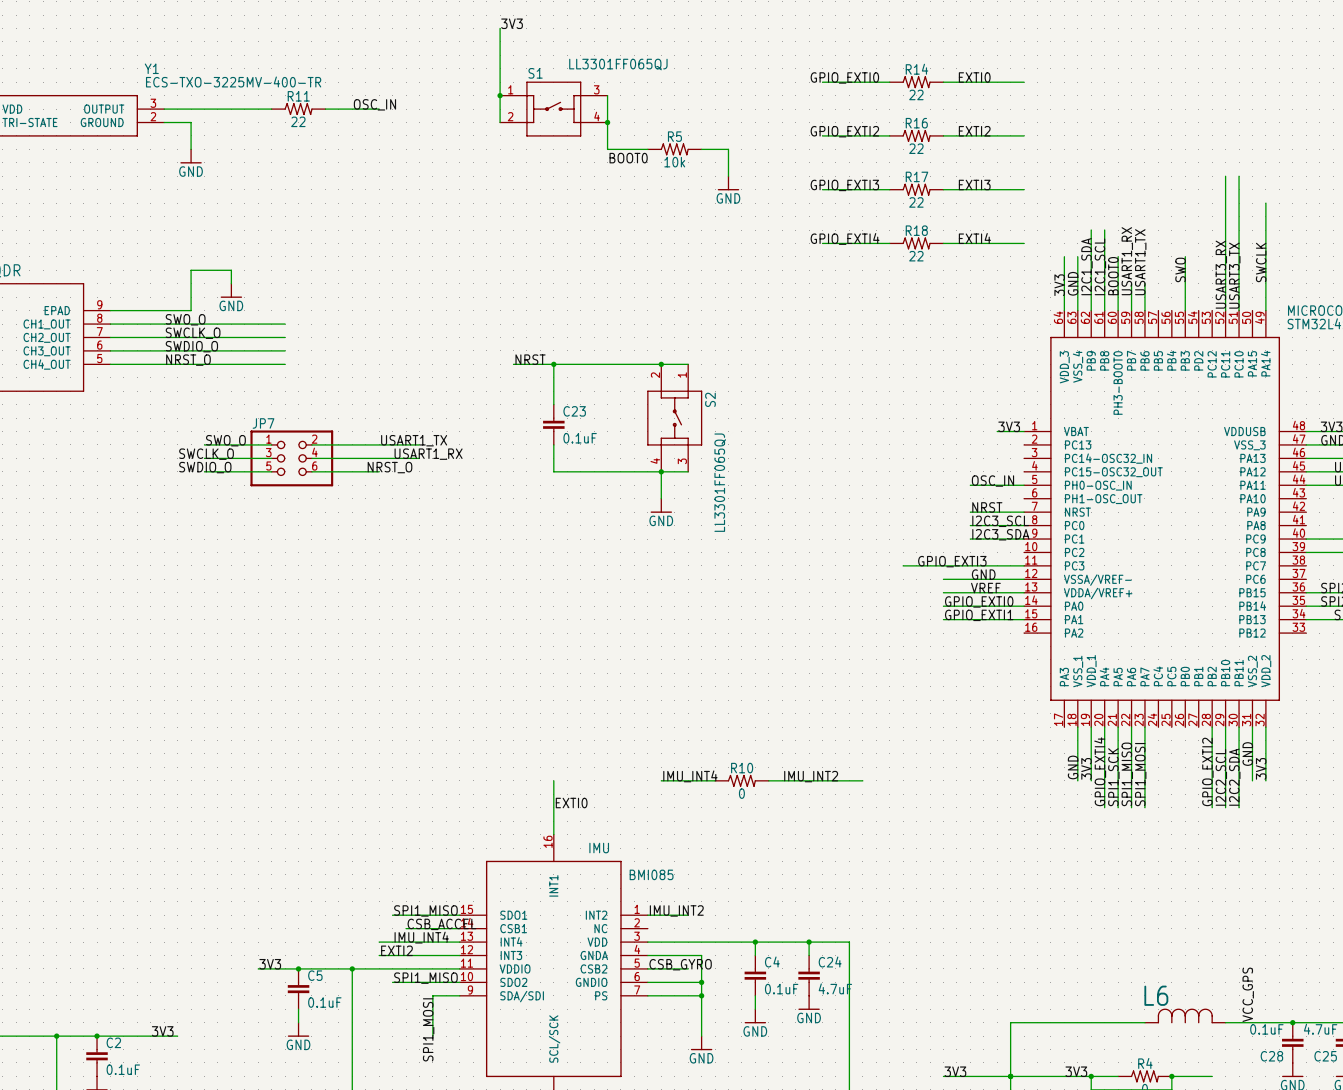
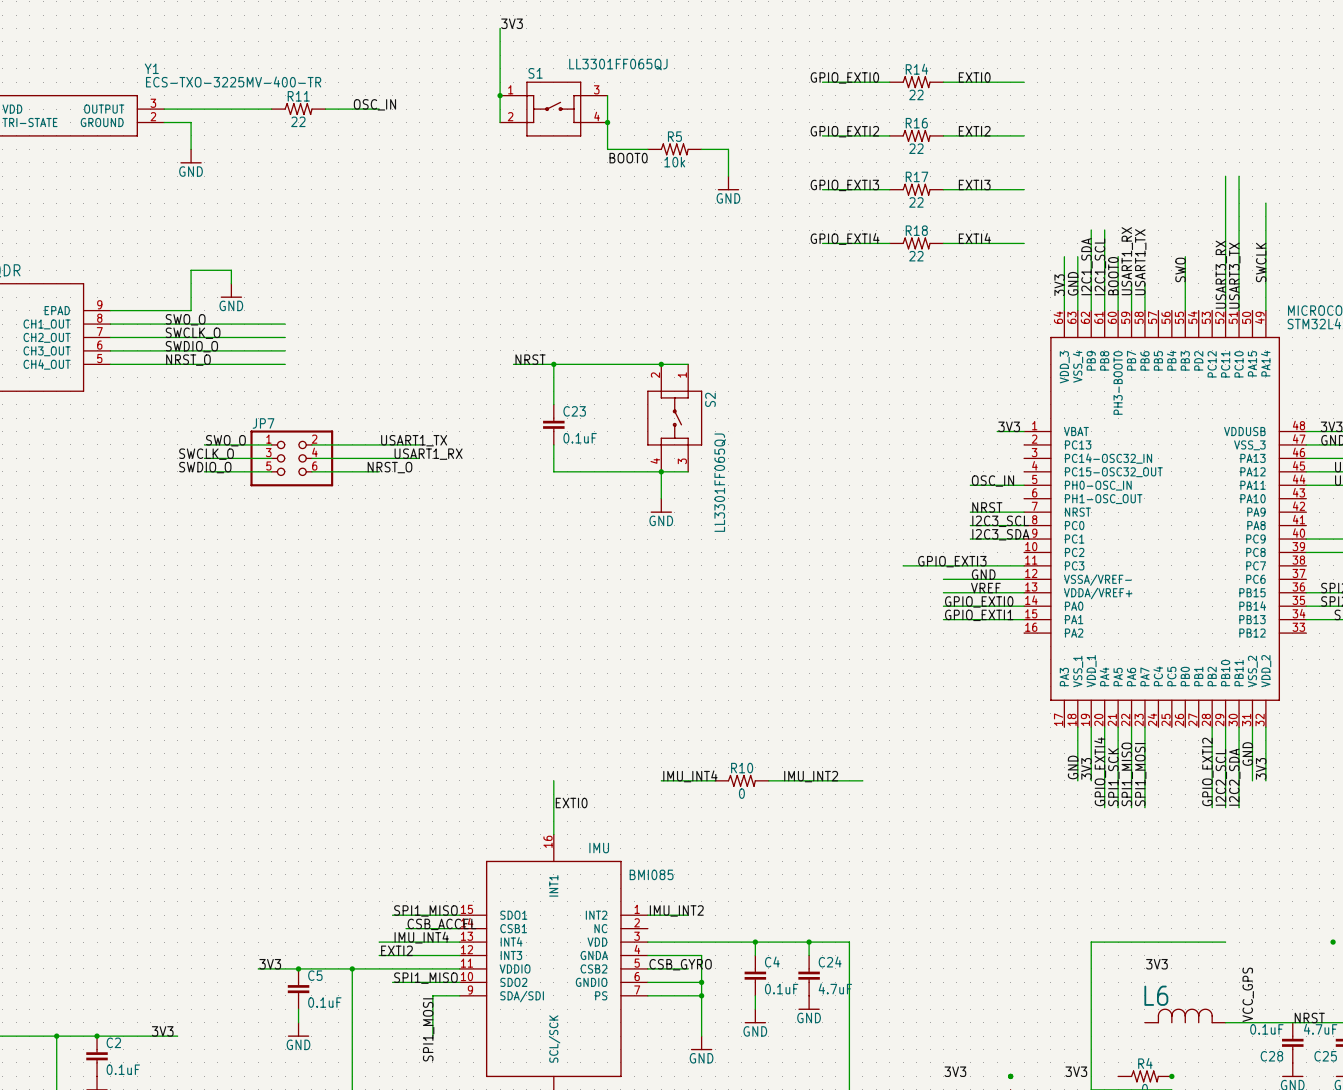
wire: none -> (1225, 942) (1091, 942) (1091, 1076)
junction: none -> (1333, 942)
label: none -> 3V3 (1156, 964)
label: none -> NRST (1309, 1017)
wire: (1144, 1022) (1010, 1022) (1010, 1089) -> none
junction: (1292, 1022) -> none
wire: (943, 1076) (1118, 1076) -> none
junction: (1091, 1076) -> none
wire: (1212, 1076) (1171, 1076) (1171, 1089) -> none

